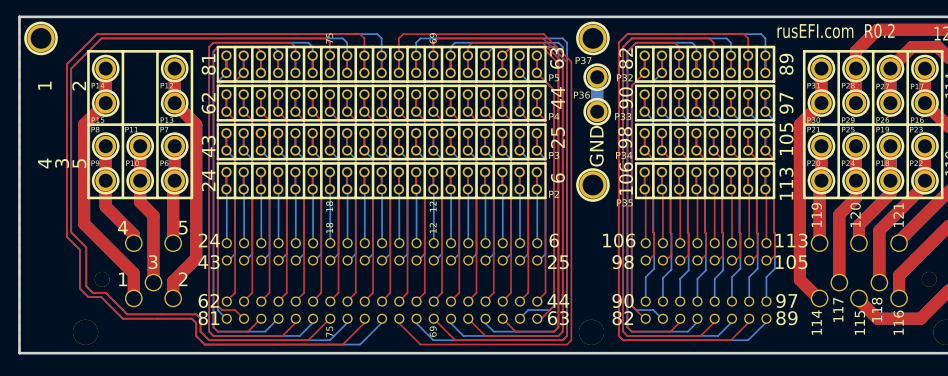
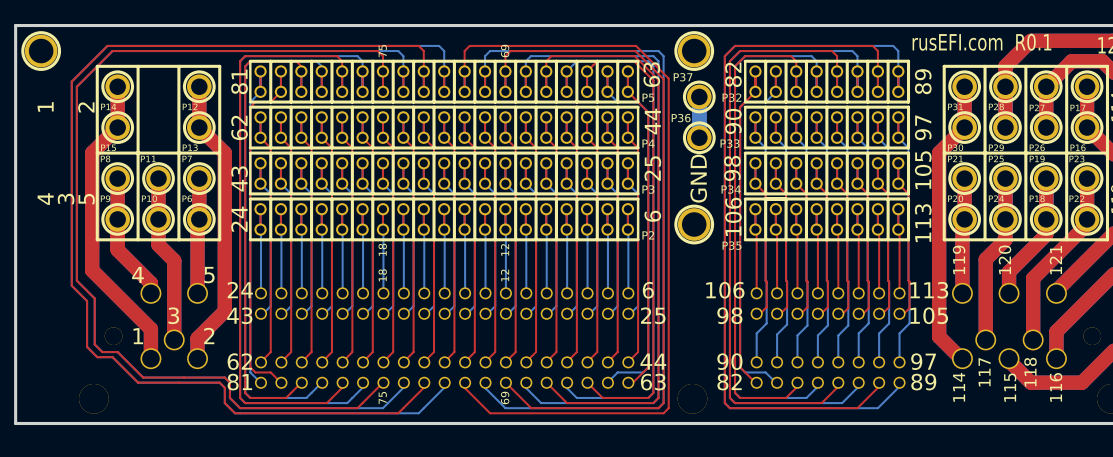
text: rusEFI.com R0.2 (836, 31) -> rusEFI.com R0.1 (981, 42)

